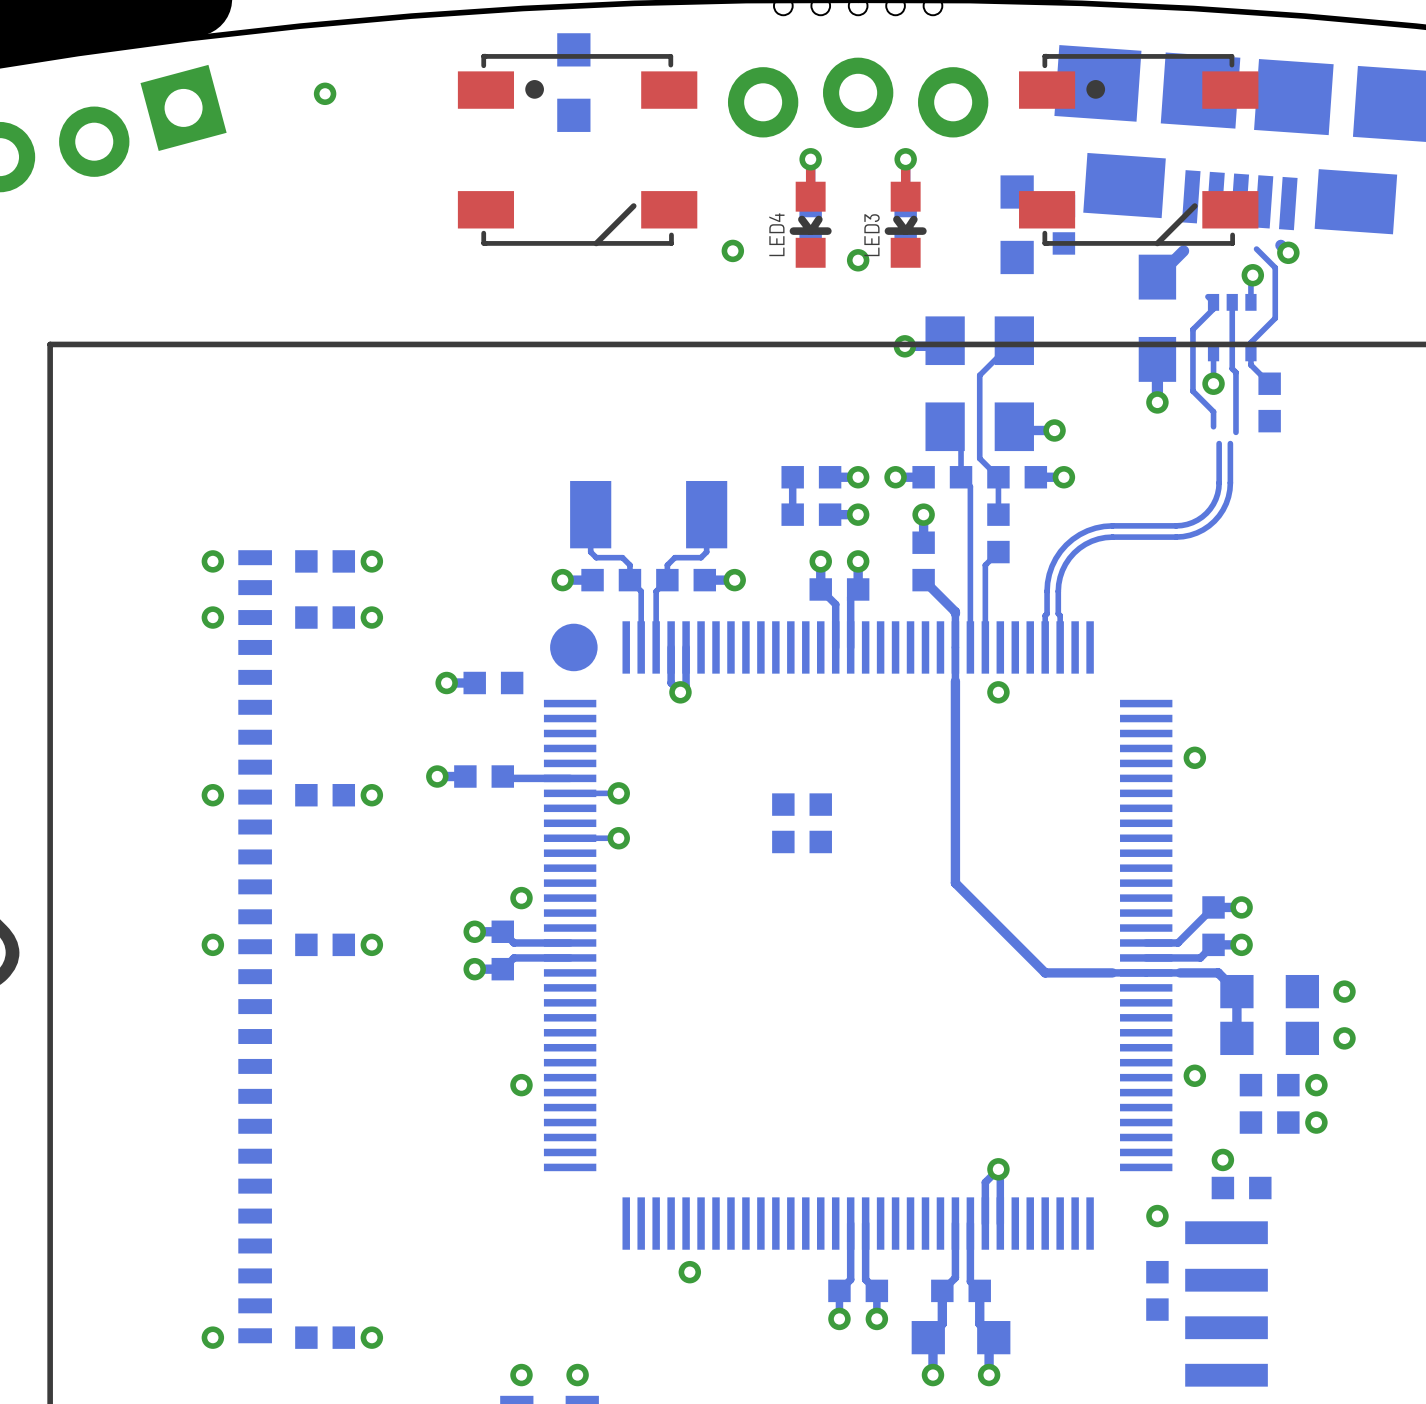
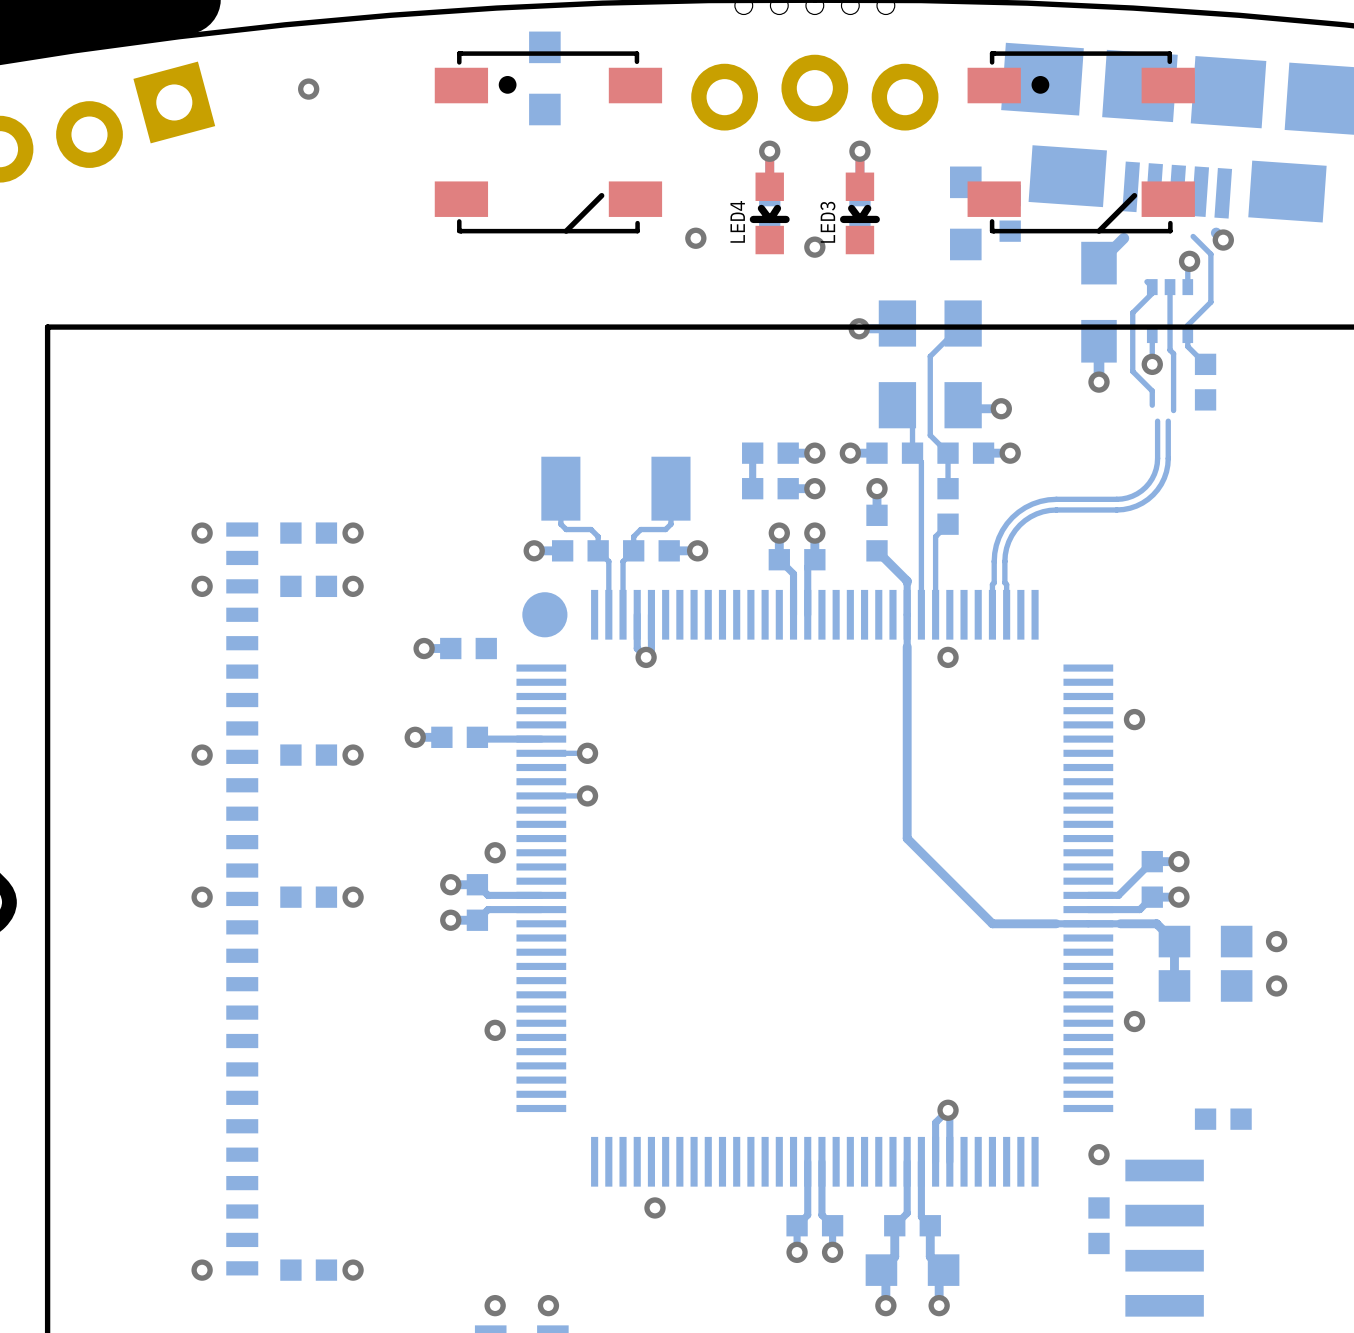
part: (802, 804) -> none
part: (802, 841) -> none
part: (1269, 1085) -> none
via: (1316, 1085) -> none
part: (1269, 1122) -> none
via: (1316, 1122) -> none
via: (1222, 1159) -> none
part: none -> (1223, 1119)
part: (1241, 1188) -> none

